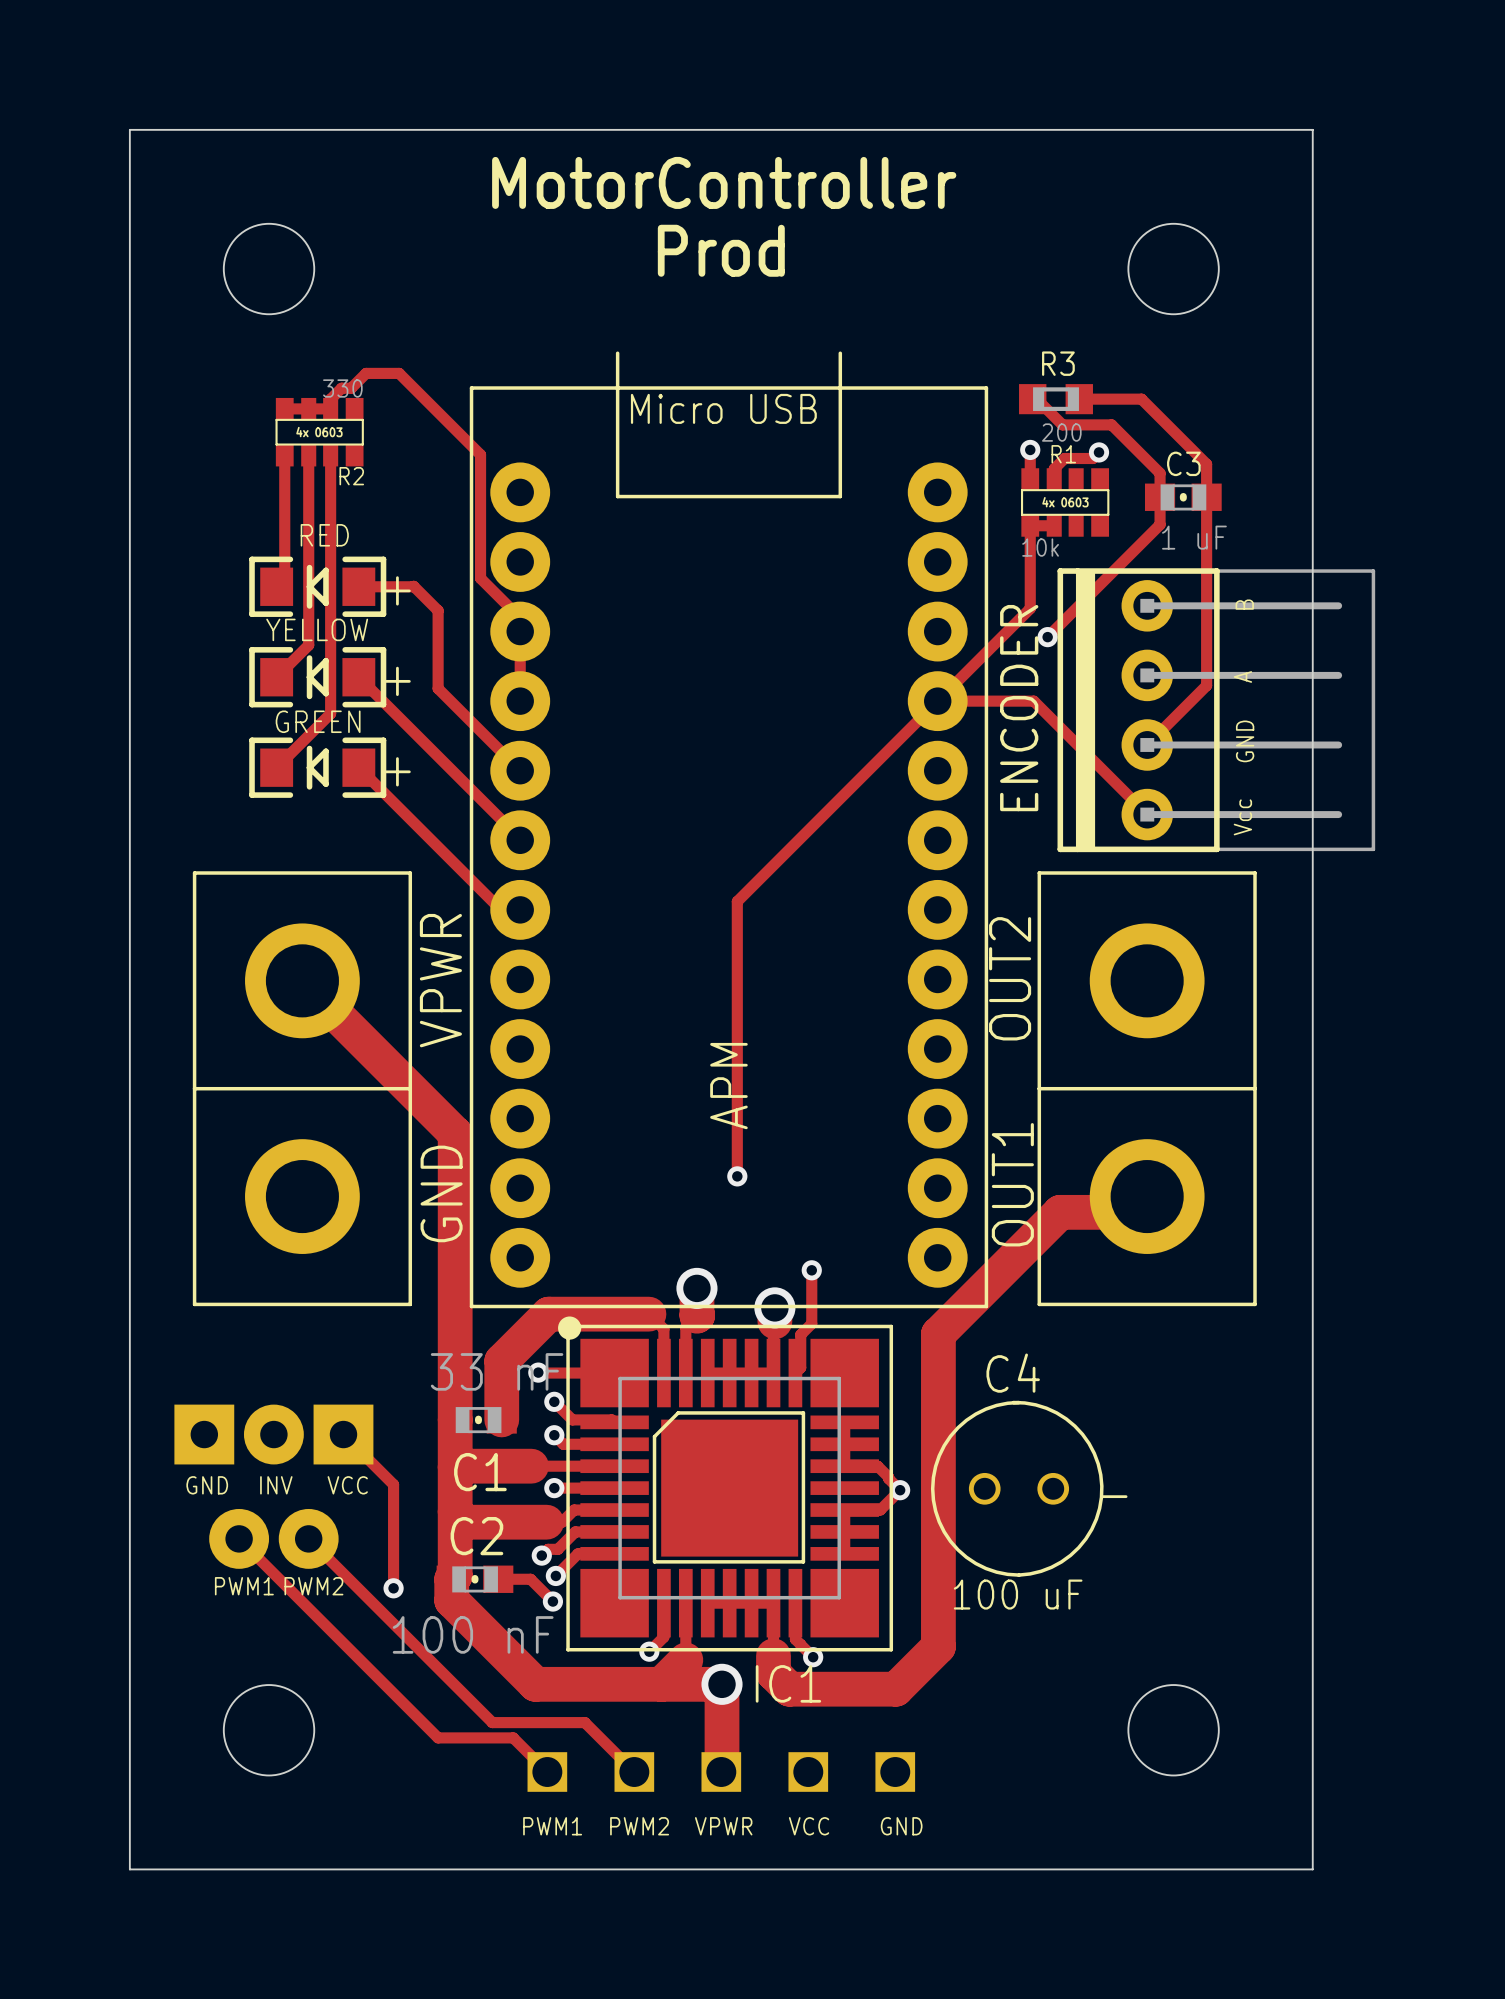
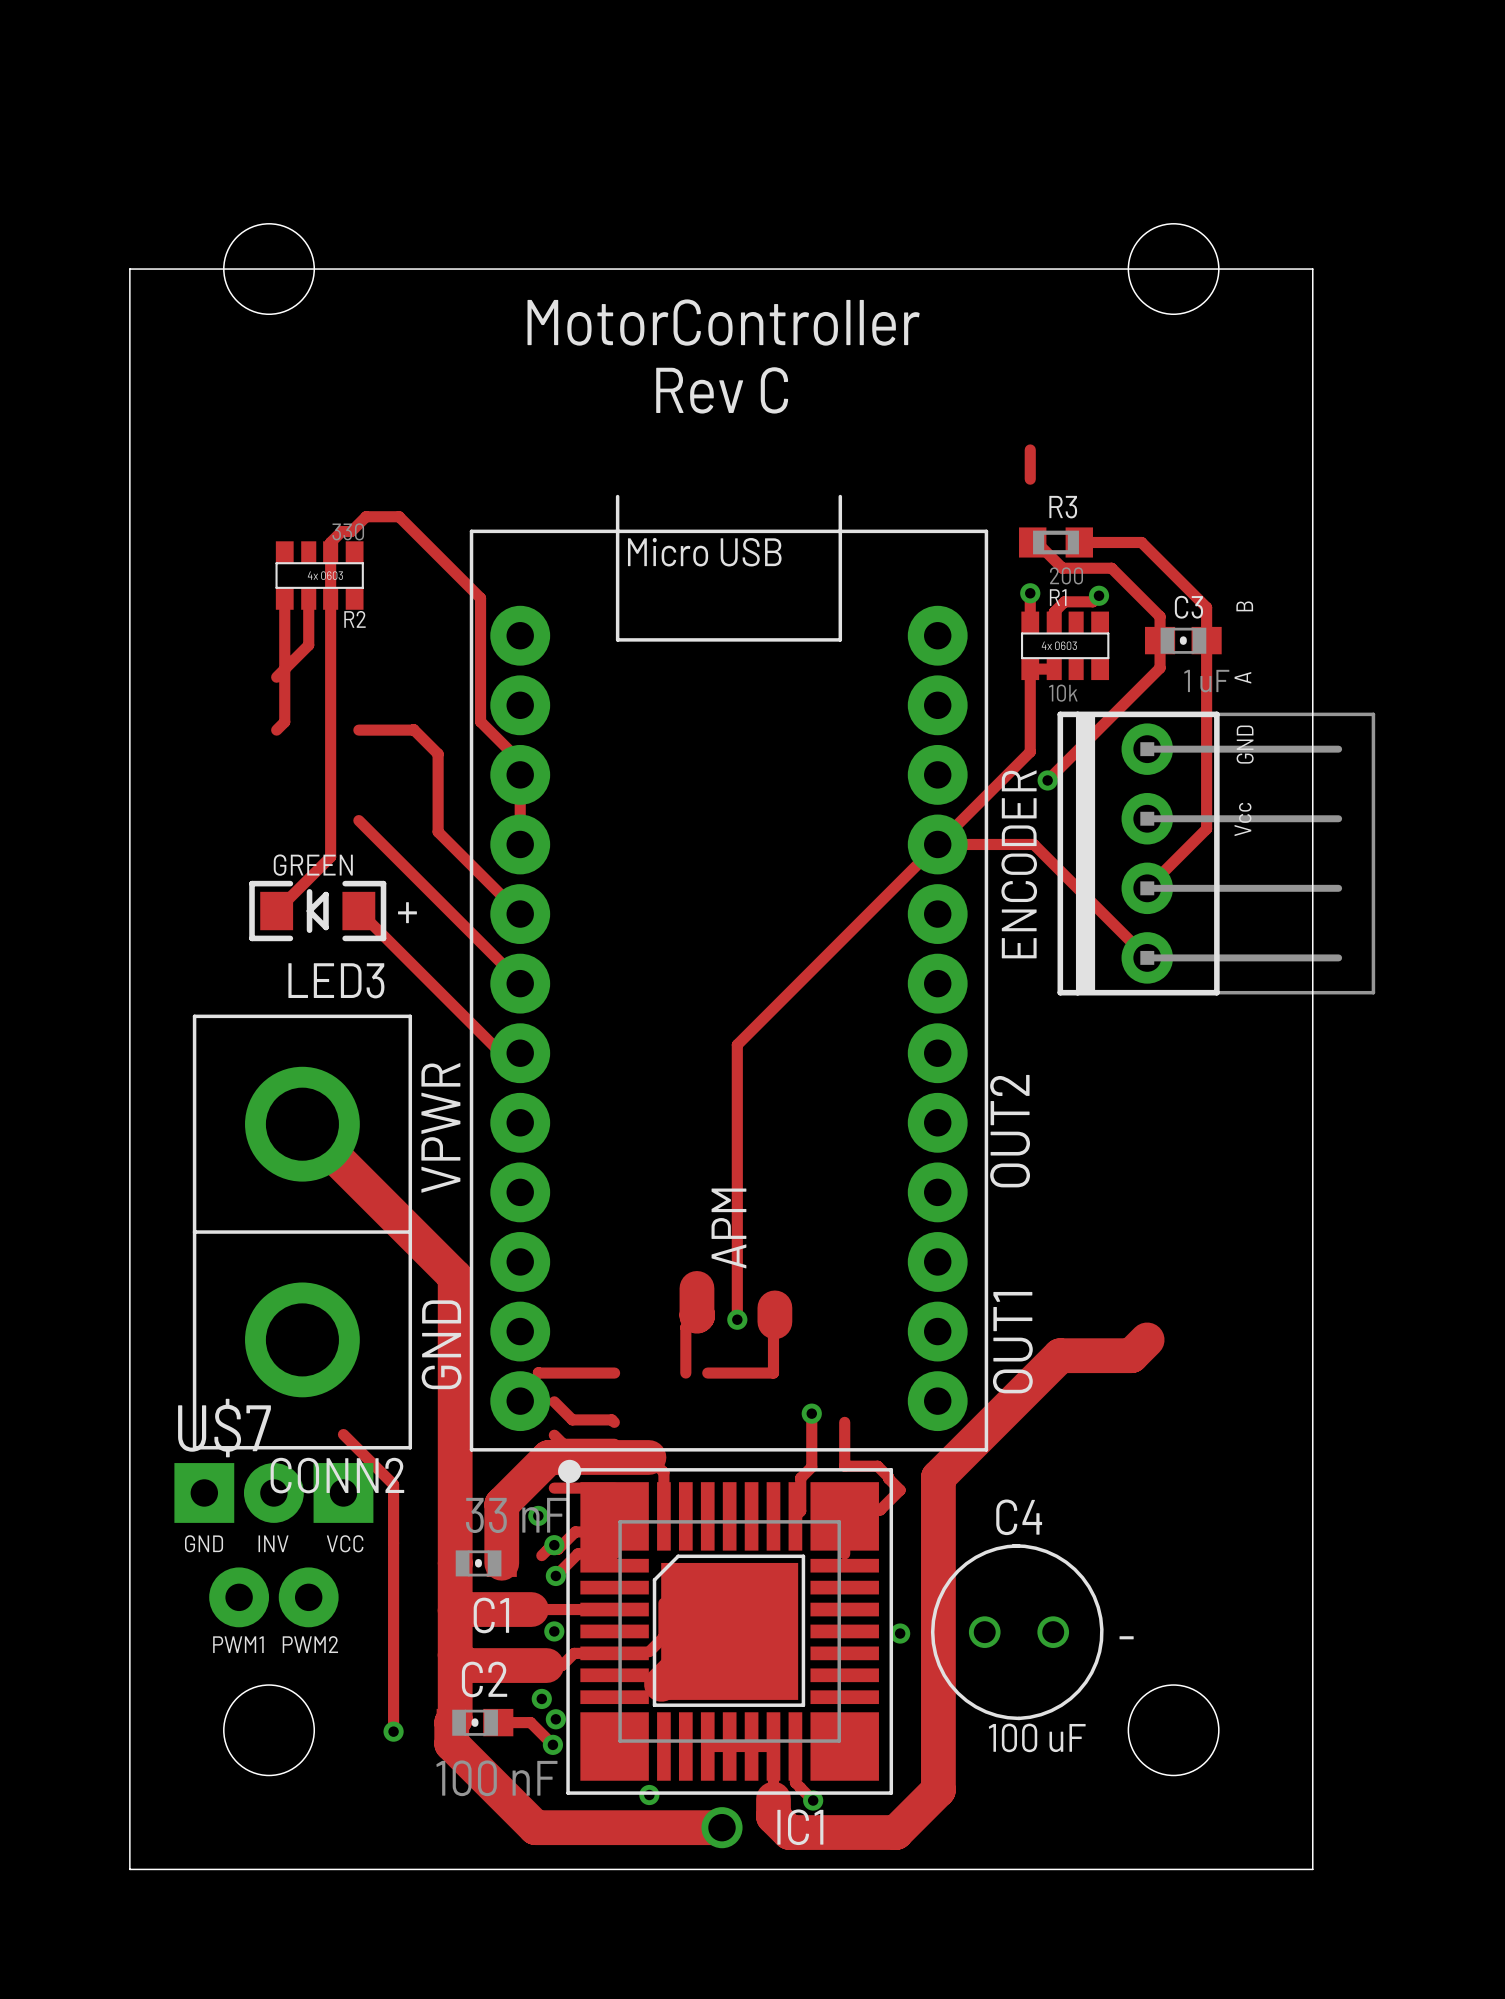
text position: MotorController (724, 182) -> MotorController (723, 322)
text: Prod (721, 250) -> none
board edge: (129, 269) (129, 129) (1312, 129) (1312, 269) -> (129, 269) (1312, 269)
text: none -> Rev C (722, 390)
track: (1032, 399) (1036, 399) (1062, 424) (1111, 424) (1160, 473) (1160, 524) (1047, 637) -> (1032, 542) (1036, 542) (1062, 568) (1111, 568) (1160, 616) (1160, 668) (1047, 780)
R3 position: (1056, 399) -> (1056, 542)
track: (1079, 399) (1141, 399) (1206, 464) (1206, 607) -> (1079, 542) (1141, 542) (1206, 607)
track: (284, 408) (330, 408) (330, 399) (341, 388) (351, 388) (366, 373) (399, 373) (480, 454) (480, 578) (520, 618) (520, 701) -> none
R2 position: (319, 432) -> (319, 575)
via: (1030, 449) -> none
track: (1099, 452) (1092, 458) (1064, 458) (1054, 468) (1054, 479) -> (1099, 595) (1092, 601) (1064, 601) (1054, 612) (1054, 622)
via: (1099, 452) -> none
track: (284, 455) (284, 578) (276, 586) -> (284, 598) (284, 722) (276, 730)
track: (308, 455) (308, 598) -> none
track: (330, 455) (330, 542) -> none
C3 position: (1183, 497) -> (1183, 640)
R1 position: (1065, 502) -> (1065, 645)
track: (1054, 525) (1030, 525) (1030, 593) -> none
R1 value position: 10k (1040, 547) -> 10k (1063, 693)
part: RED (317, 586) -> none
track: (358, 586) (413, 586) (438, 610) (438, 688) (520, 770) -> (358, 730) (413, 729) (438, 754) (438, 831) (520, 914)
via: none -> (1030, 593)
via: none -> (1099, 595)
track: (1030, 608) (737, 901) (737, 1044) -> (1054, 669) (1030, 669) (1030, 751) (737, 1044)
via: (1047, 637) -> none
part: YELLOW (317, 677) -> none
track: (358, 677) (520, 838) -> (330, 542) (341, 531) (351, 531) (366, 516) (399, 516) (480, 598) (480, 721) (520, 761) (520, 838)
track: (1206, 685) (1147, 744) -> (1206, 685) (1206, 828) (1147, 888)
track: (937, 701) (1033, 701) (1147, 814) -> (937, 844) (1033, 844) (1147, 957)
ENCODER position: (1216, 710) -> (1216, 853)
track: (330, 713) (276, 767) -> (330, 713) (330, 857) (276, 911)
part: GREEN (317, 767) -> none
track: (358, 767) (501, 909) (520, 909) -> (358, 911) (501, 1053) (520, 1053)
via: none -> (1047, 780)
track: none -> (358, 820) (520, 983)
APM position: (728, 829) -> (728, 973)
LED3: none -> GREEN (317, 911)
text position: OUT2 (1010, 978) -> OUT2 (1010, 1131)
track: (302, 980) (455, 1133) (455, 1276) -> (302, 1124) (455, 1276)
text position: VPWR (440, 980) -> VPWR (440, 1127)
part: (302, 1088) -> none
part: (1147, 1088) -> none
track: none -> (737, 1176) (737, 1319)
via: (737, 1176) -> none
text position: OUT1 (1012, 1184) -> OUT1 (1012, 1342)
text position: GND (441, 1193) -> GND (441, 1344)
track: (1147, 1196) (1131, 1212) (1060, 1212) (938, 1334) (938, 1477) -> (1147, 1339) (1131, 1355) (1060, 1355) (938, 1477)
CONN2: none -> (302, 1232)
track: (811, 1270) (811, 1323) (800, 1334) (800, 1367) (795, 1373) -> (811, 1413) (811, 1467) (800, 1478) (800, 1511) (795, 1516)
via: (811, 1270) -> none
via: (696, 1288) -> none
via: (774, 1307) -> none
via: none -> (737, 1319)
via: (538, 1372) -> none
track: (663, 1373) (663, 1329) (648, 1314) (548, 1314) (501, 1361) (501, 1419) -> (663, 1516) (663, 1472) (648, 1457) (548, 1457) (501, 1504) (501, 1563)
via: (554, 1401) -> none
via: none -> (811, 1413)
C1 position: (478, 1419) -> (478, 1563)
via: (554, 1435) -> none
track: (614, 1466) (455, 1467) -> (614, 1609) (455, 1610)
IC1 position: (725, 1483) -> (725, 1627)
part: (273, 1486) -> none
via: (554, 1488) -> none
C4 position: (1017, 1488) -> (1017, 1632)
via: (900, 1490) -> none
track: (614, 1510) (574, 1510) (561, 1522) (465, 1522) (455, 1511) -> (614, 1653) (574, 1653) (561, 1665) (465, 1665) (455, 1655)
via: none -> (538, 1515)
track: (239, 1538) (438, 1737) (513, 1737) (547, 1772) -> none
track: (308, 1538) (492, 1722) (498, 1722) -> none
U$7: none -> (273, 1545)
via position: (541, 1555) -> (554, 1545)
track: (455, 1575) (451, 1579) (451, 1600) (535, 1684) (722, 1684) (721, 1772) -> (455, 1575) (455, 1719) (451, 1722) (451, 1743) (535, 1827) (722, 1827)
C2 position: (474, 1579) -> (474, 1722)
track: (498, 1579) (530, 1579) (552, 1601) -> none
track: none -> (393, 1588) (393, 1731)
via: (393, 1588) -> none
via: (552, 1601) -> none
track: (707, 1603) (773, 1603) (773, 1673) (789, 1689) (895, 1689) (938, 1646) -> (707, 1746) (773, 1746) (773, 1816) (789, 1832) (895, 1832) (938, 1790) (938, 1646)
via: none -> (554, 1631)
via: none -> (900, 1633)
via: (649, 1651) -> none
via: (813, 1657) -> none
via position: (722, 1684) -> (722, 1827)
via: none -> (541, 1698)
via: none -> (555, 1719)
track: (530, 1722) (584, 1722) (634, 1772) -> (530, 1722) (552, 1744)
via: none -> (393, 1731)
via: none -> (552, 1744)
part: (721, 1772) -> none
via: none -> (649, 1795)
via: none -> (813, 1800)

